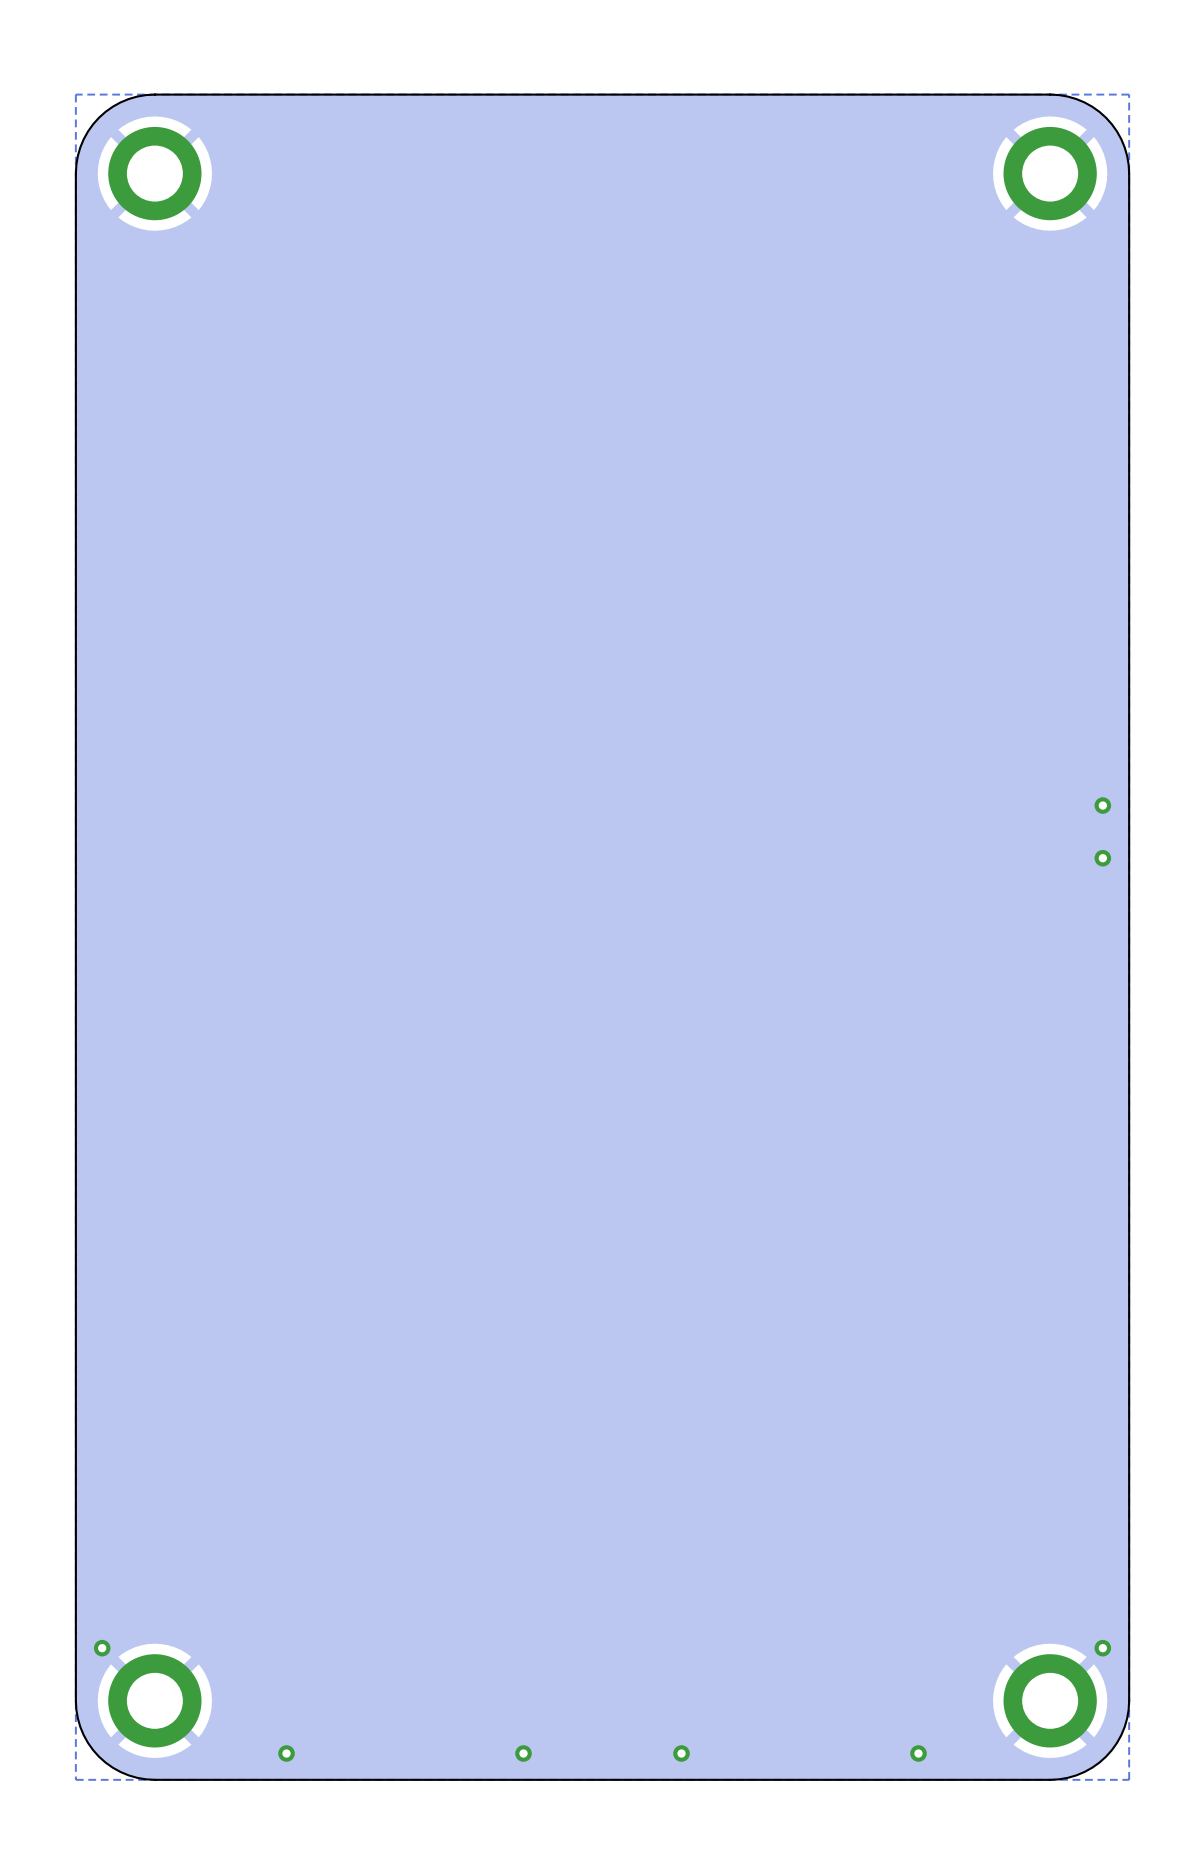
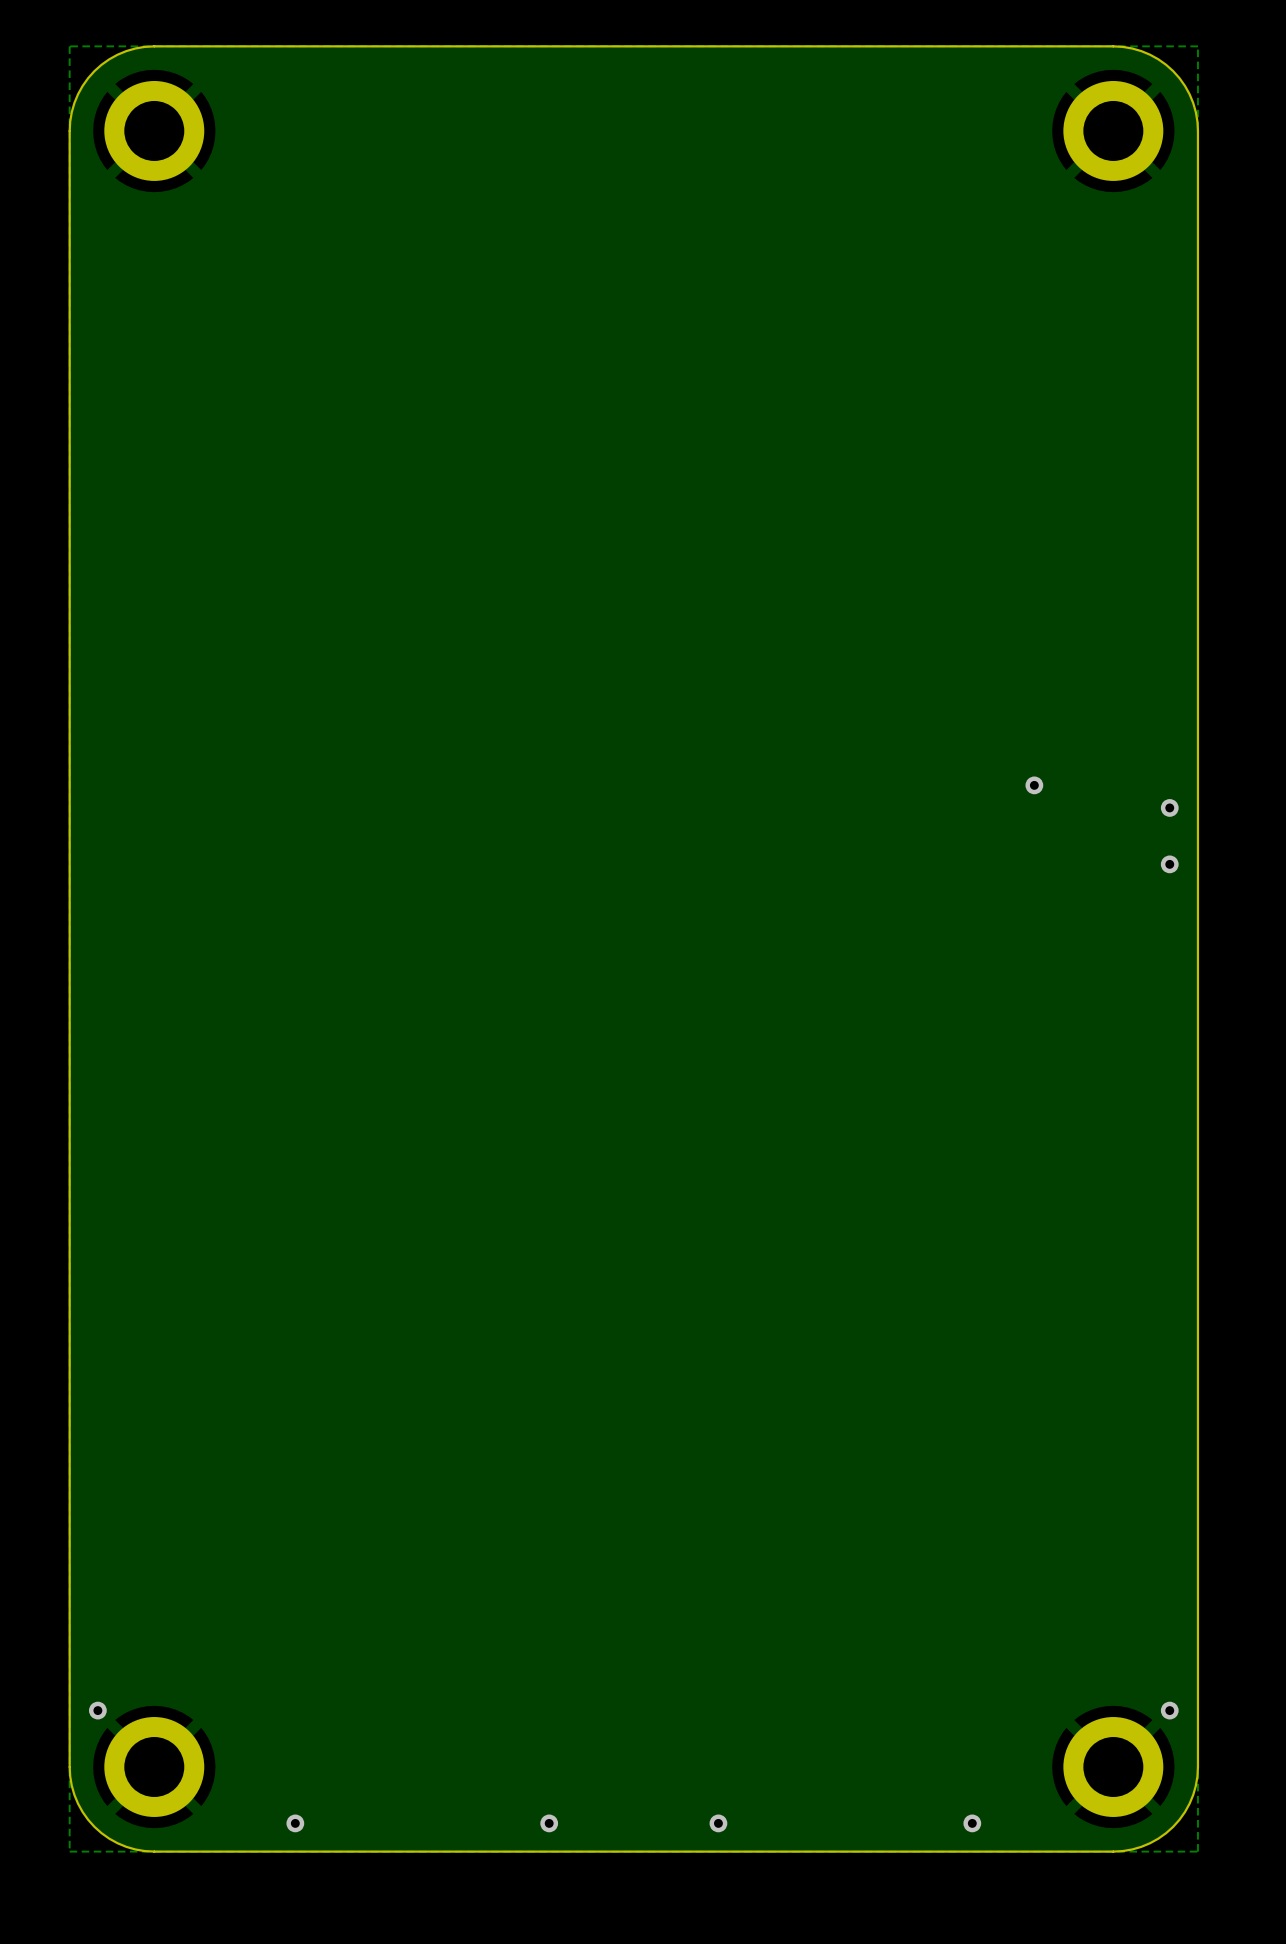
via: none -> (1034, 785)

